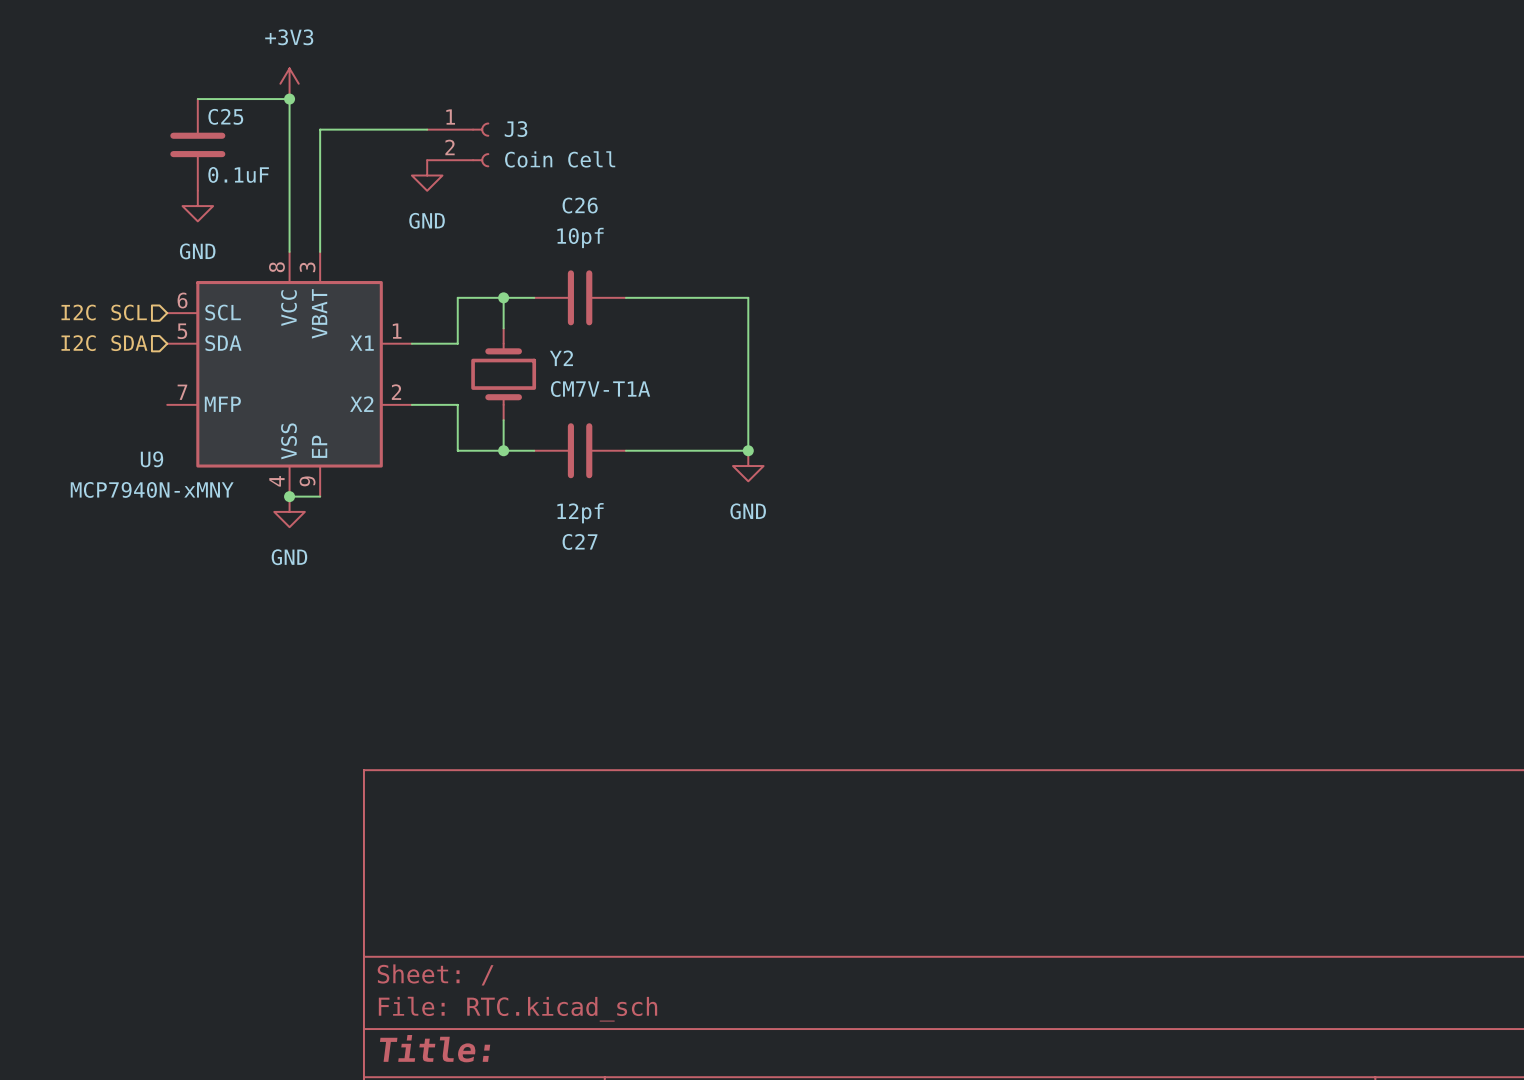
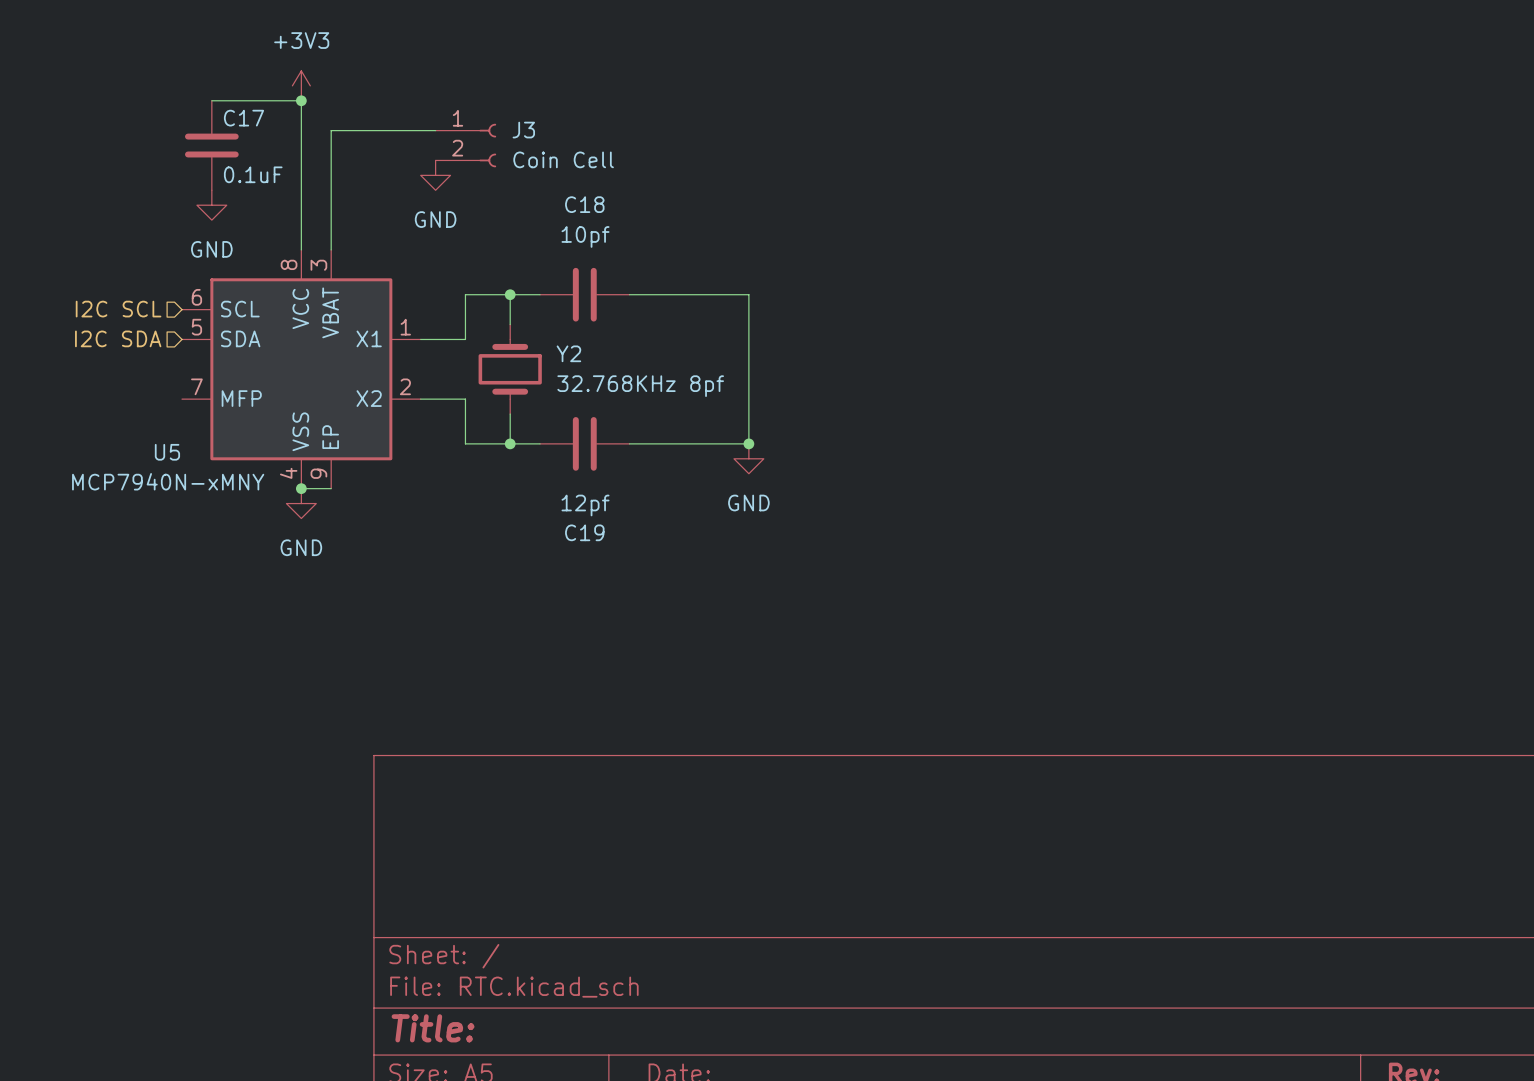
C25 name: C25 (225, 116) -> C17 (244, 118)
C26 name: C26 (580, 205) -> C18 (584, 204)
Y2 value: CM7V-T1A (600, 389) -> 32.768KHz 8pf (640, 386)
U9 name: U9 (151, 459) -> U5 (167, 452)
C27 name: C27 (580, 541) -> C19 (584, 532)

